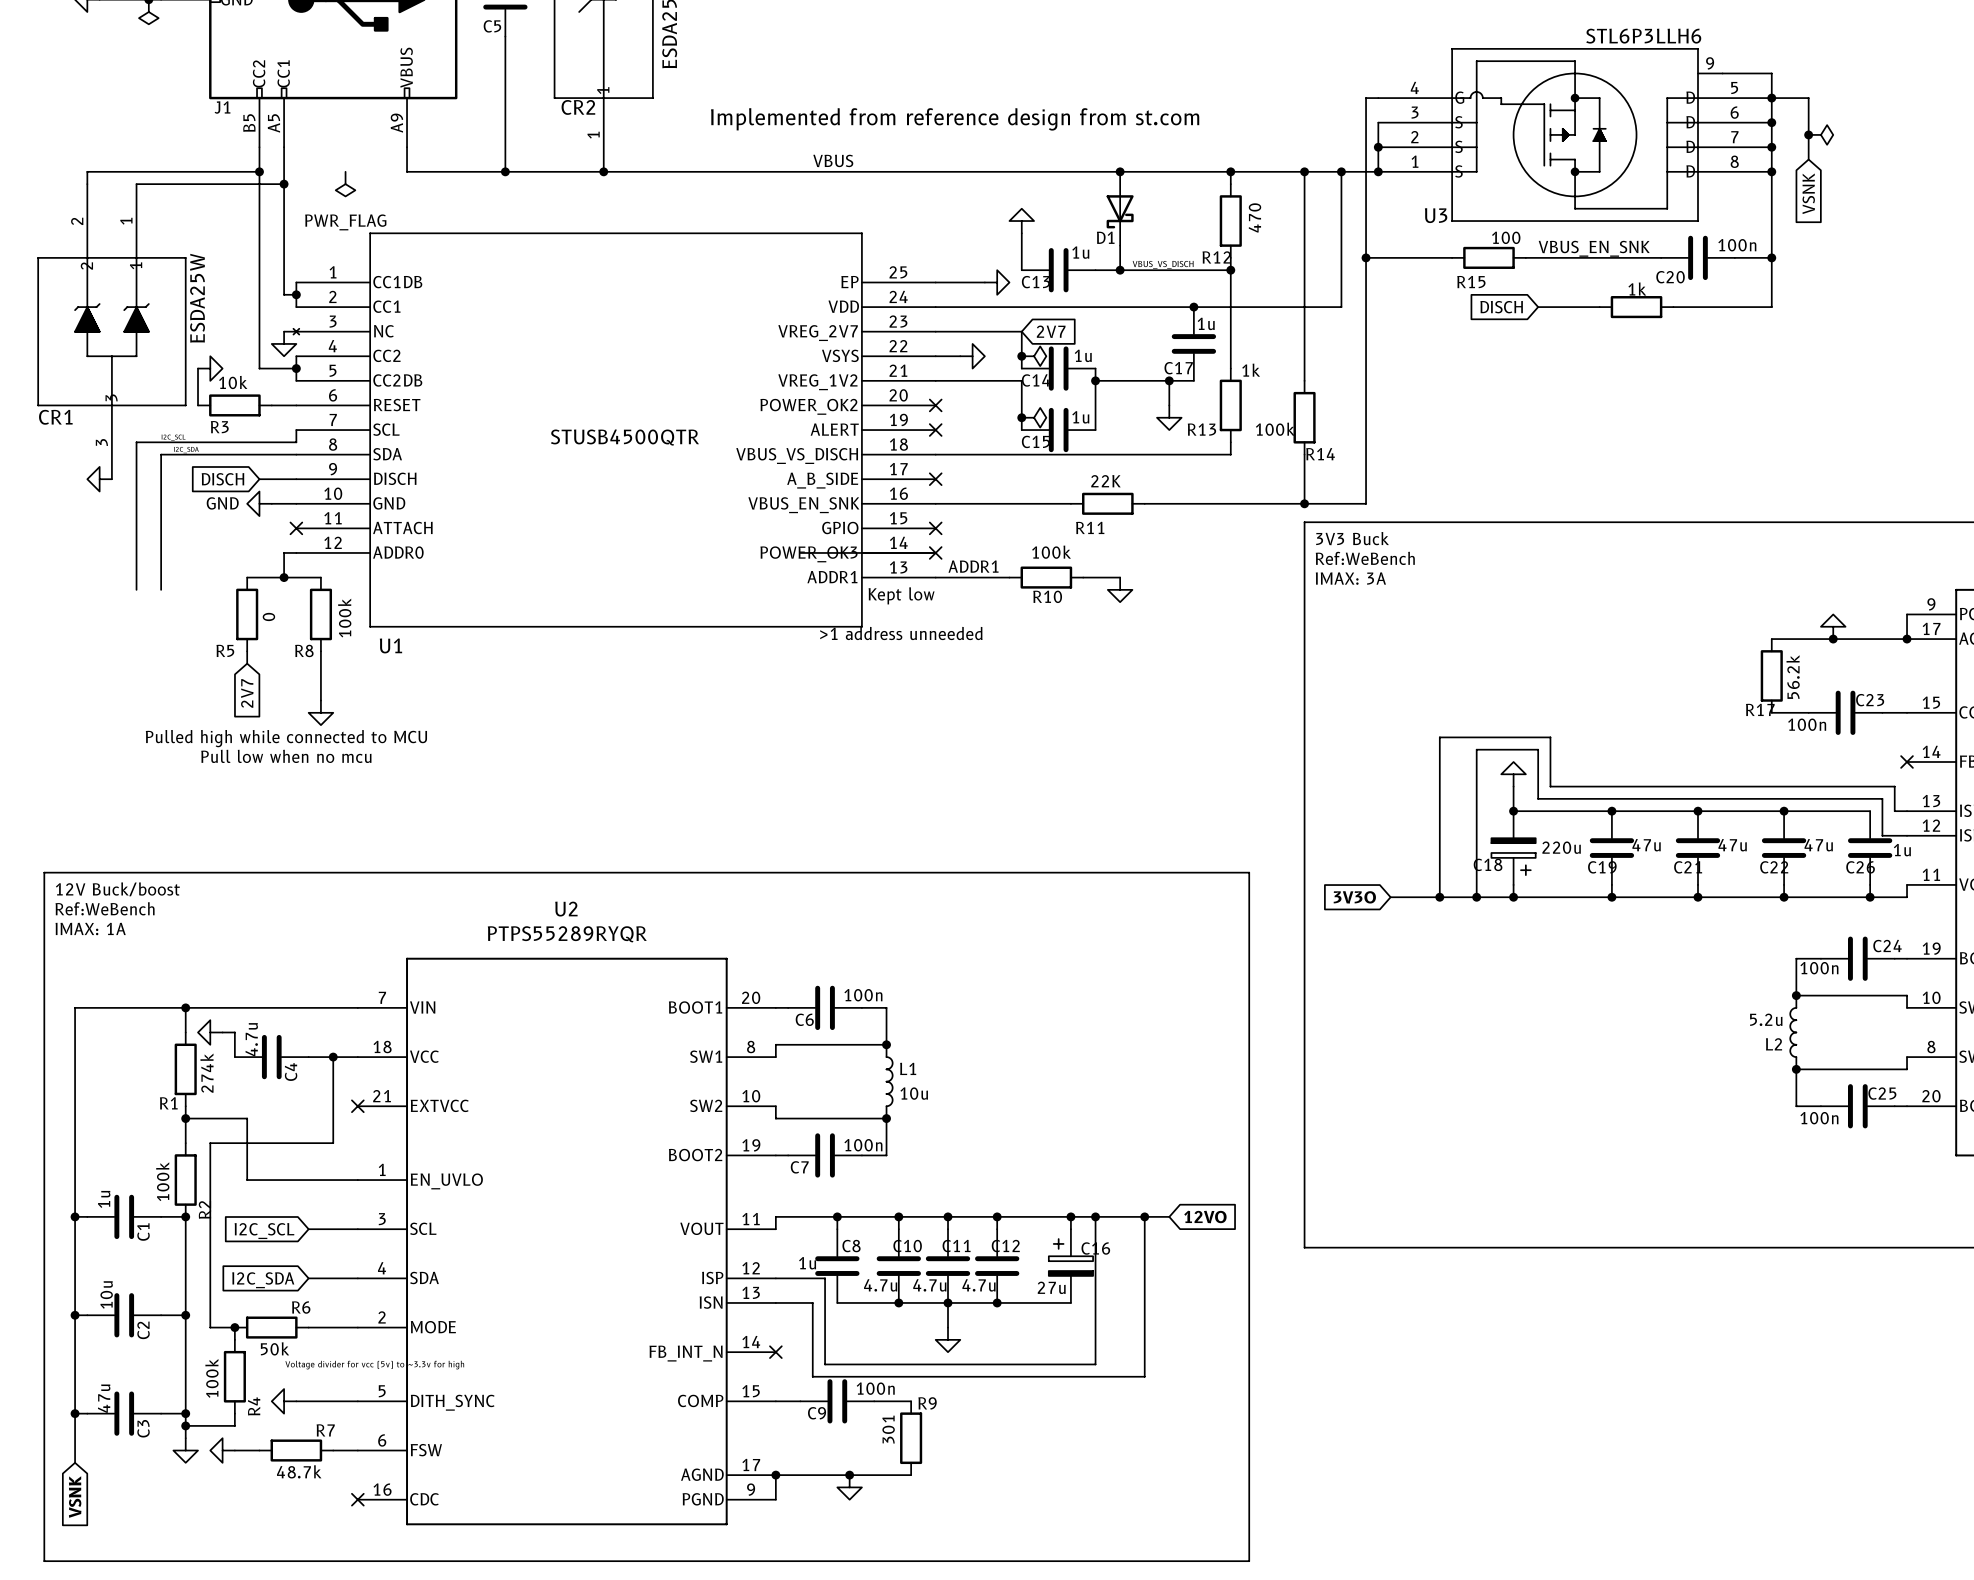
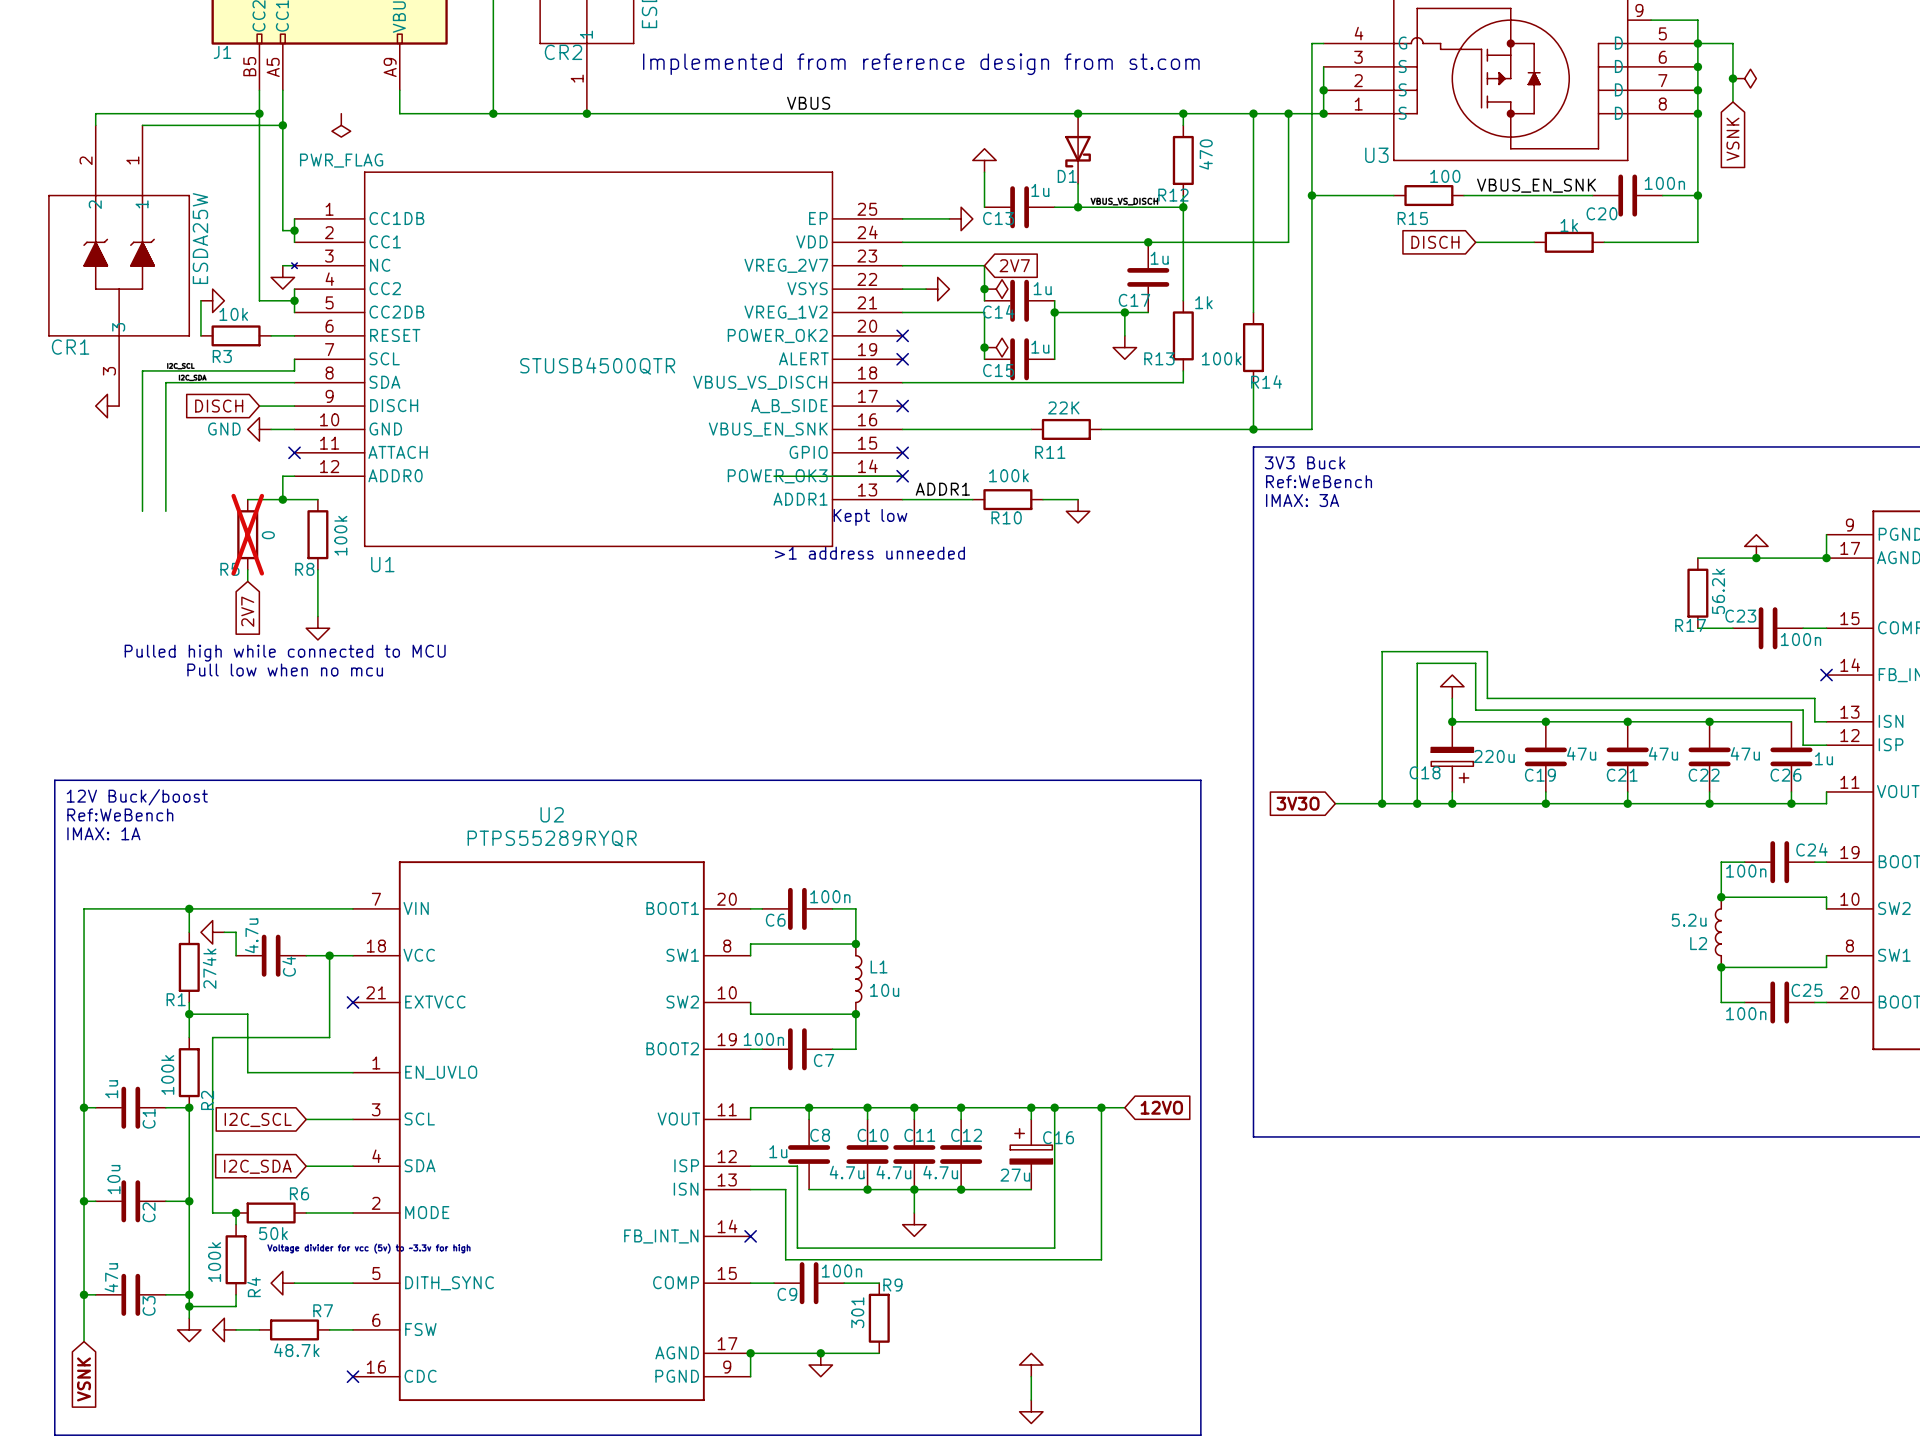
R5 do-not-place cross: none -> (247, 534)
C23 name position: C23 (1870, 700) -> C23 (1740, 616)
C23 value position: 100n (1807, 724) -> 100n (1800, 639)
C7 value position: 100n (863, 1145) -> 100n (763, 1039)
C7 name position: C7 (799, 1167) -> C7 (824, 1060)
power symbol: none -> (1031, 1365)
wire: none -> (1031, 1376) (1031, 1400)
power symbol: none -> (1031, 1411)

